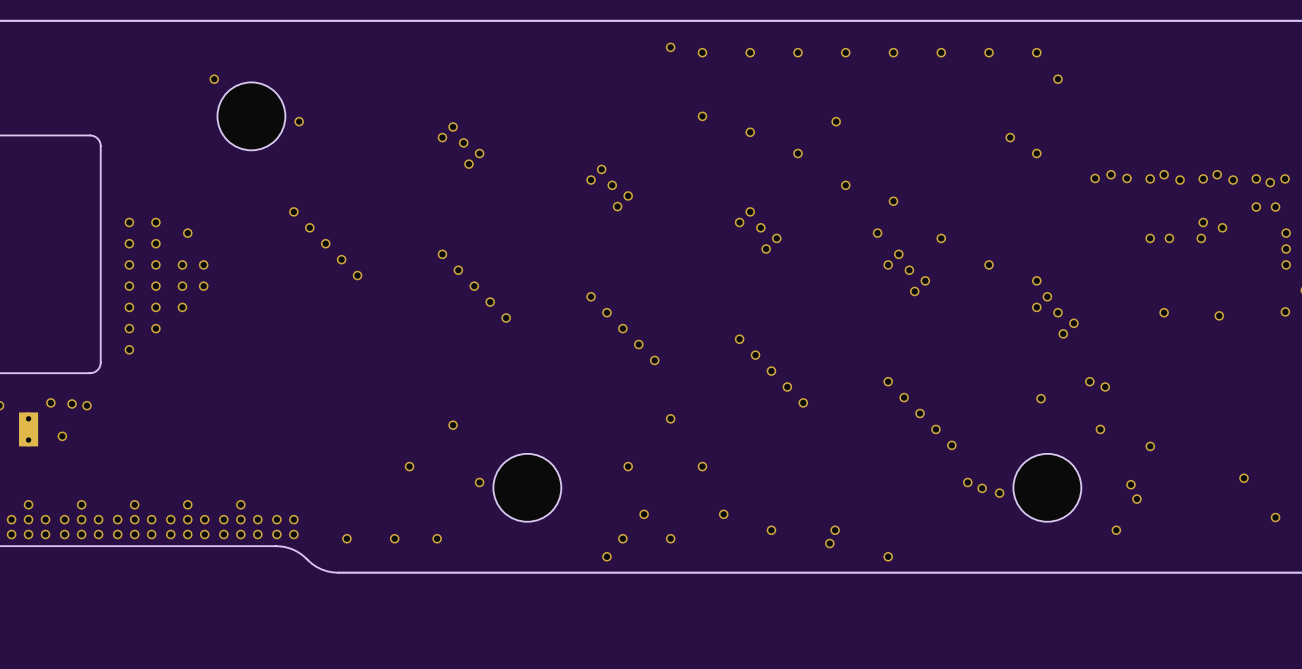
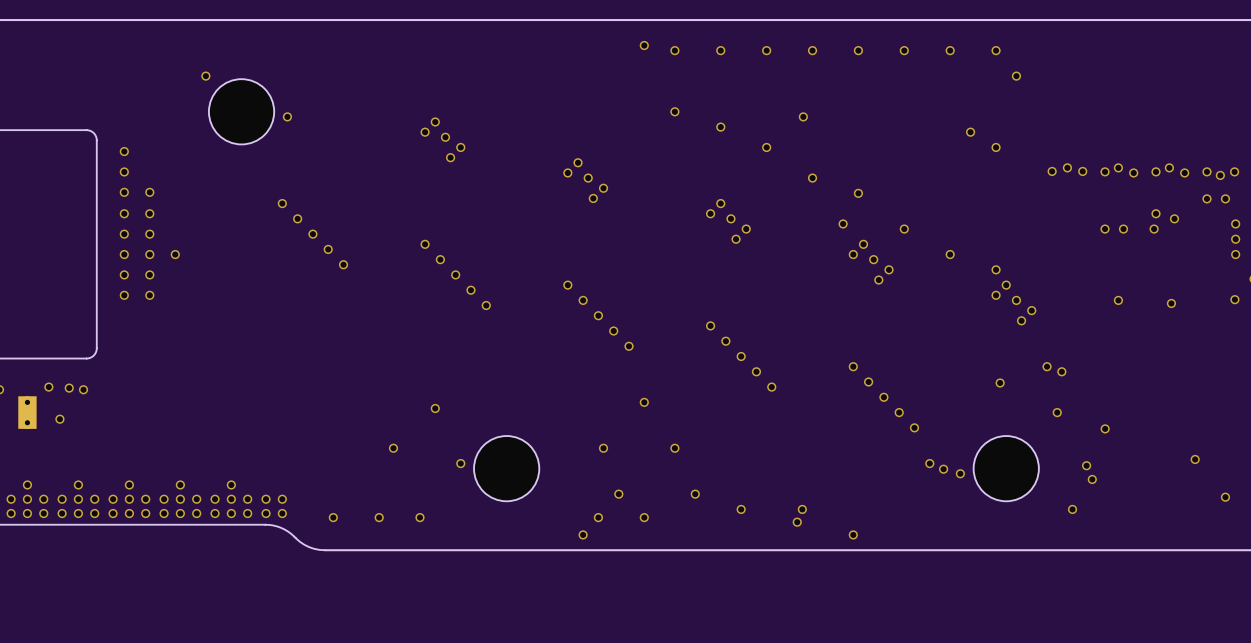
via: none -> (124, 151)
via: none -> (124, 171)
via: none -> (124, 192)
via: none -> (149, 192)
via: (187, 233) -> none
via: (203, 264) -> none
via: (182, 286) -> none
via: (203, 286) -> none
via: (182, 307) -> none
via: (129, 328) -> none
via: (155, 328) -> none
via: (129, 349) -> none

